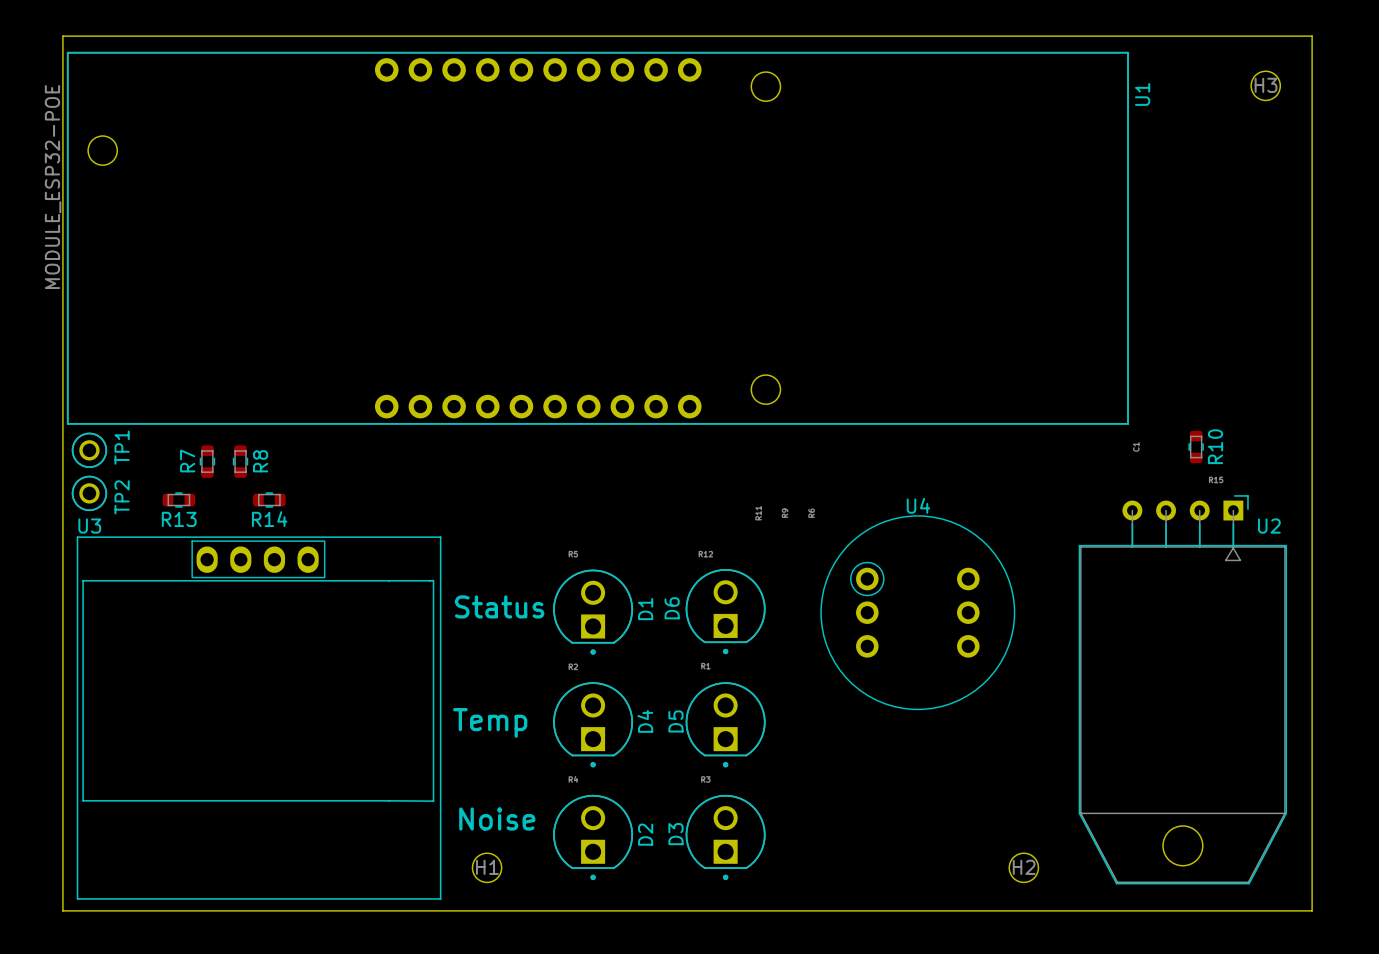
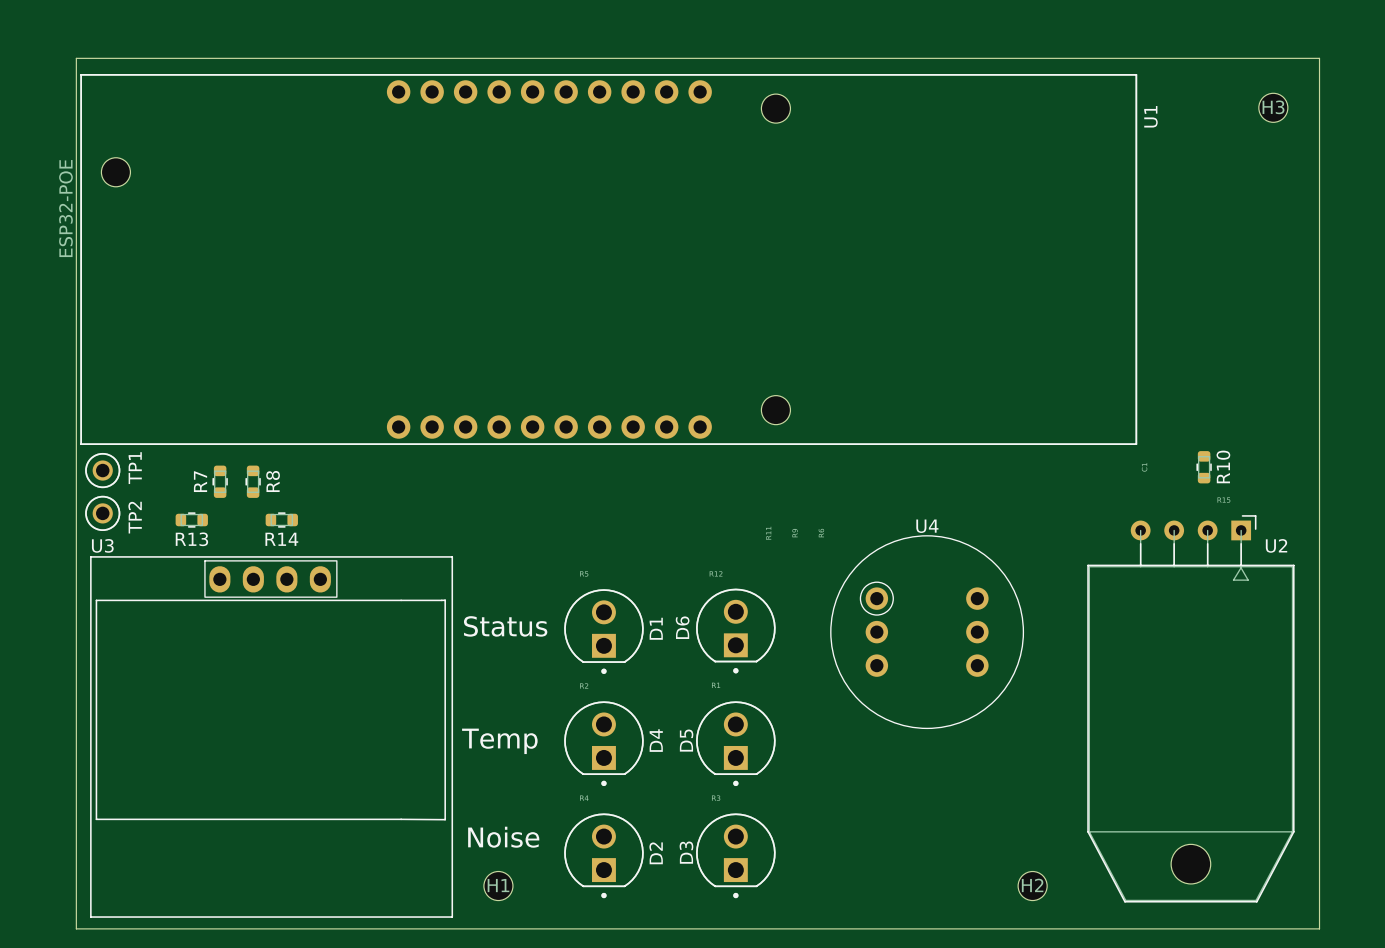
U1 value: MODULE_ESP32-POE (53, 187) -> ESP32-POE (65, 208)

